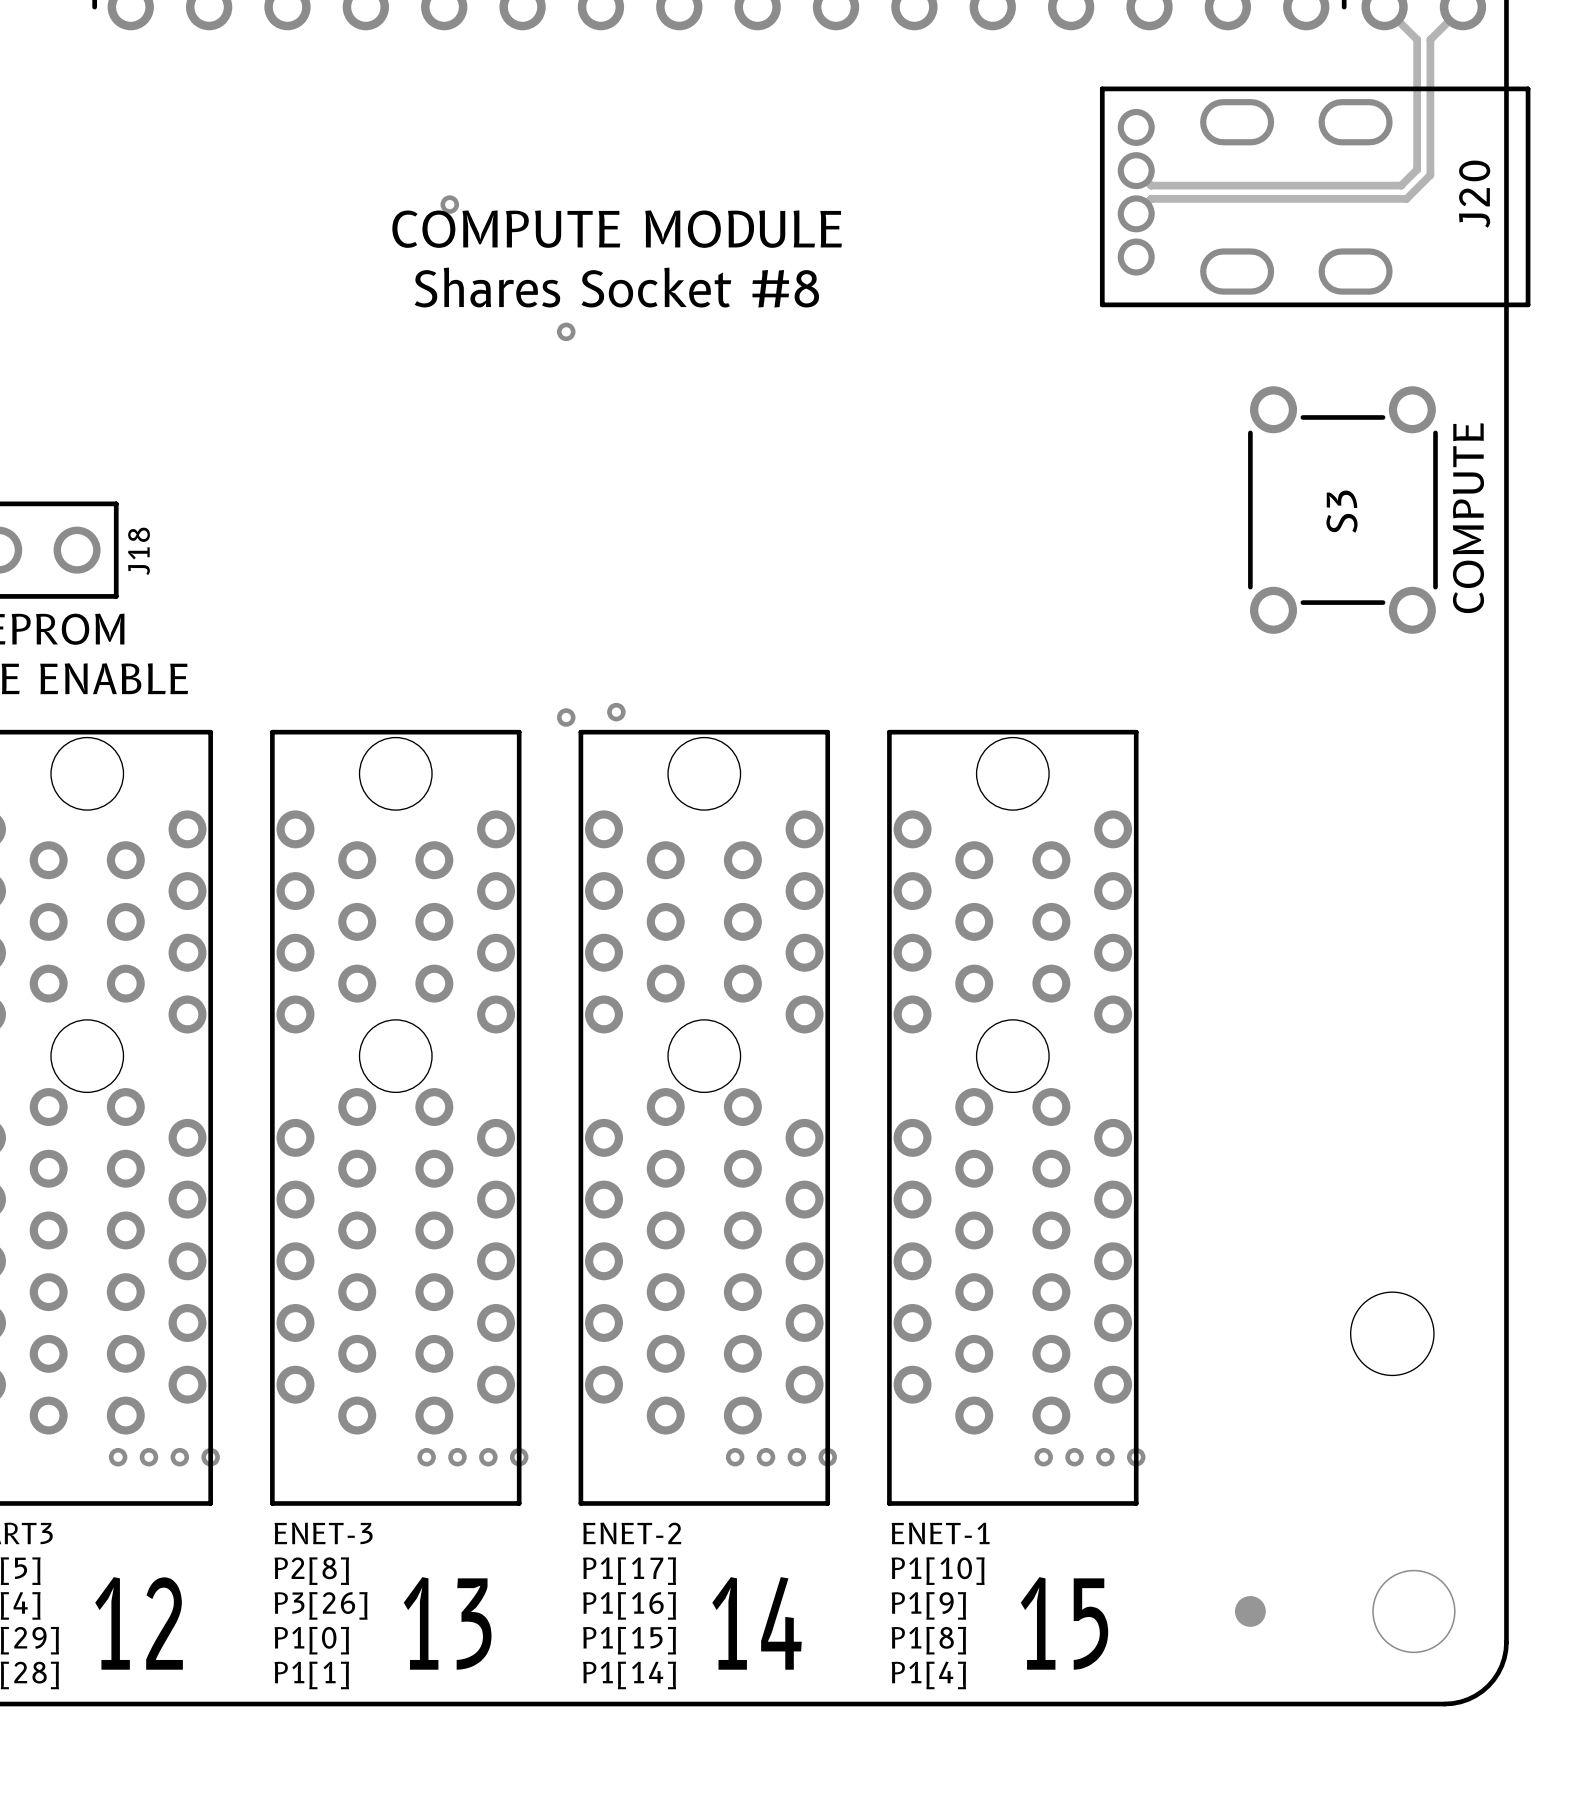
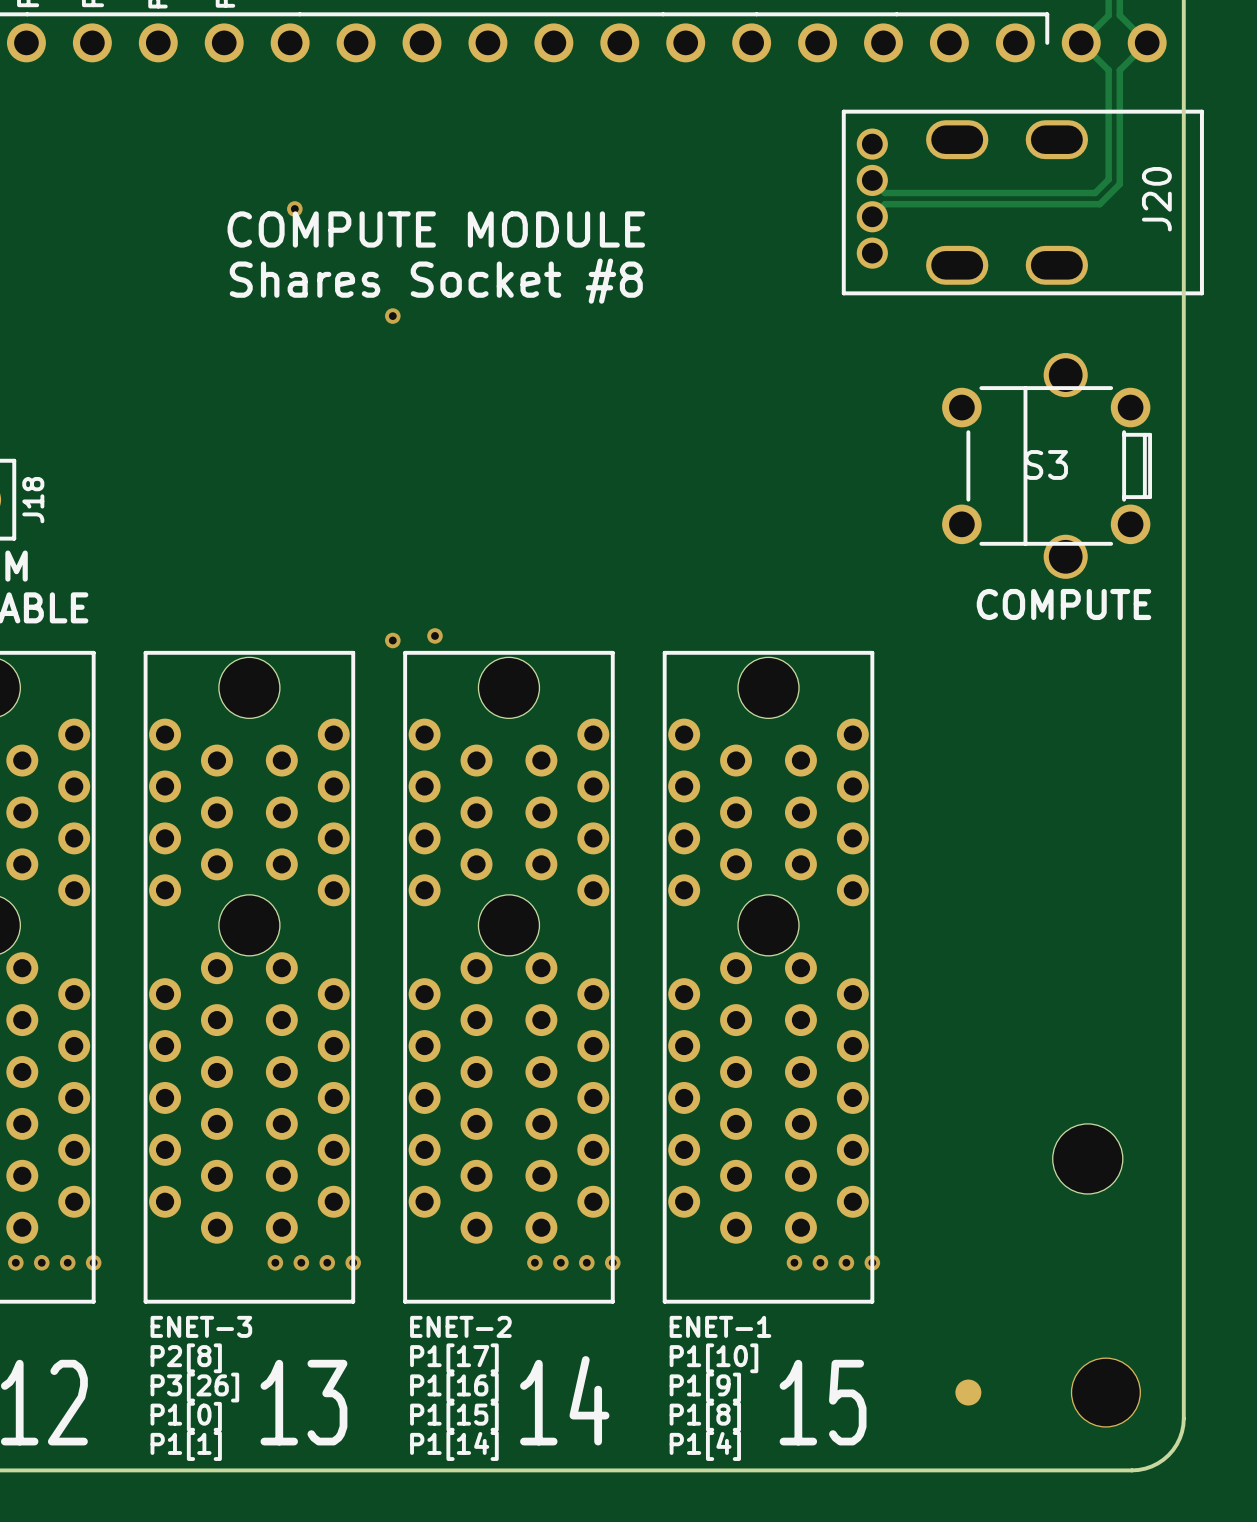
S3 footprint: [1248, 386, 1438, 634] -> [942, 353, 1153, 579]
text rotation: 0° (1468, 518) -> 90° clockwise (1063, 604)

